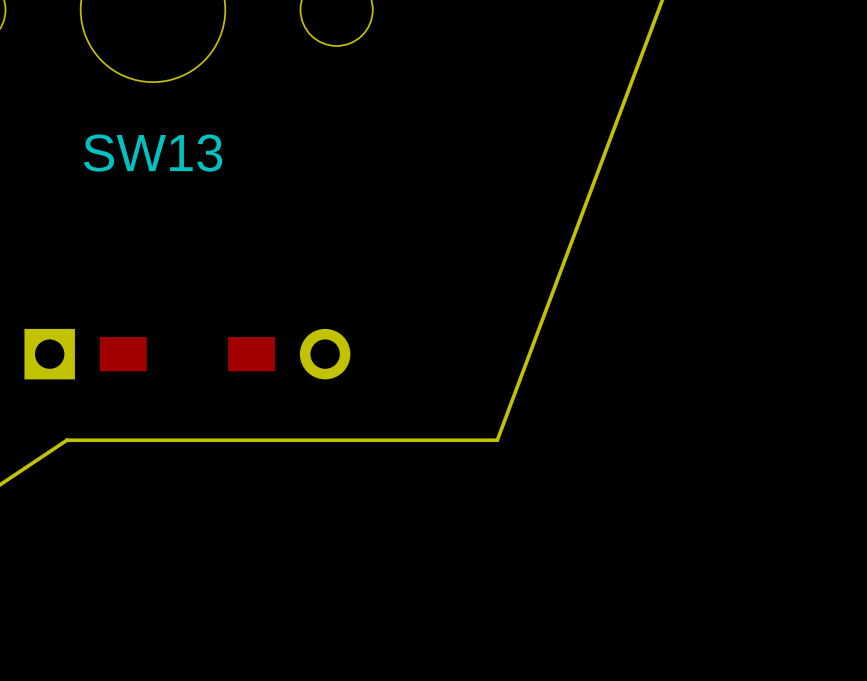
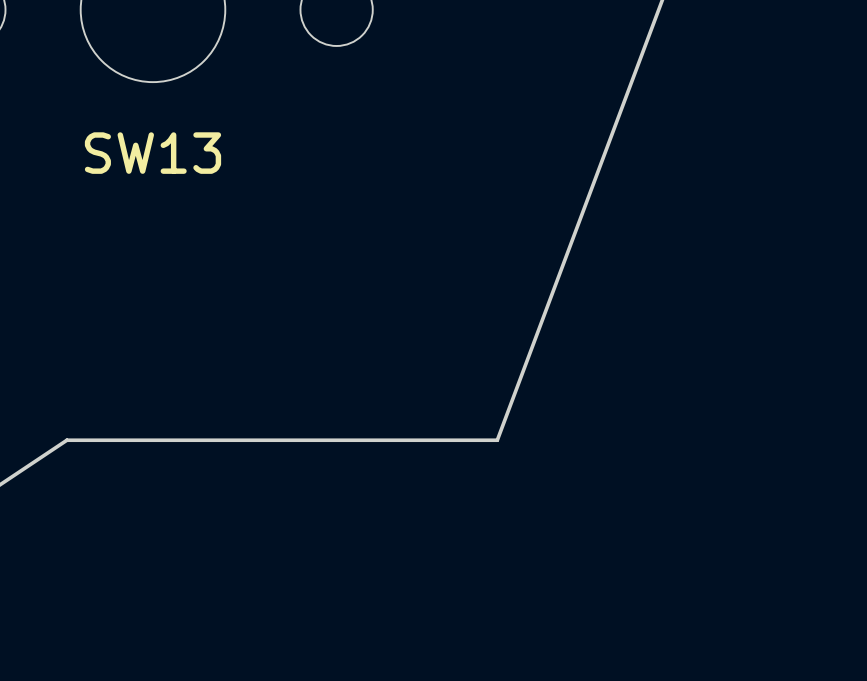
part: (187, 354) -> none

